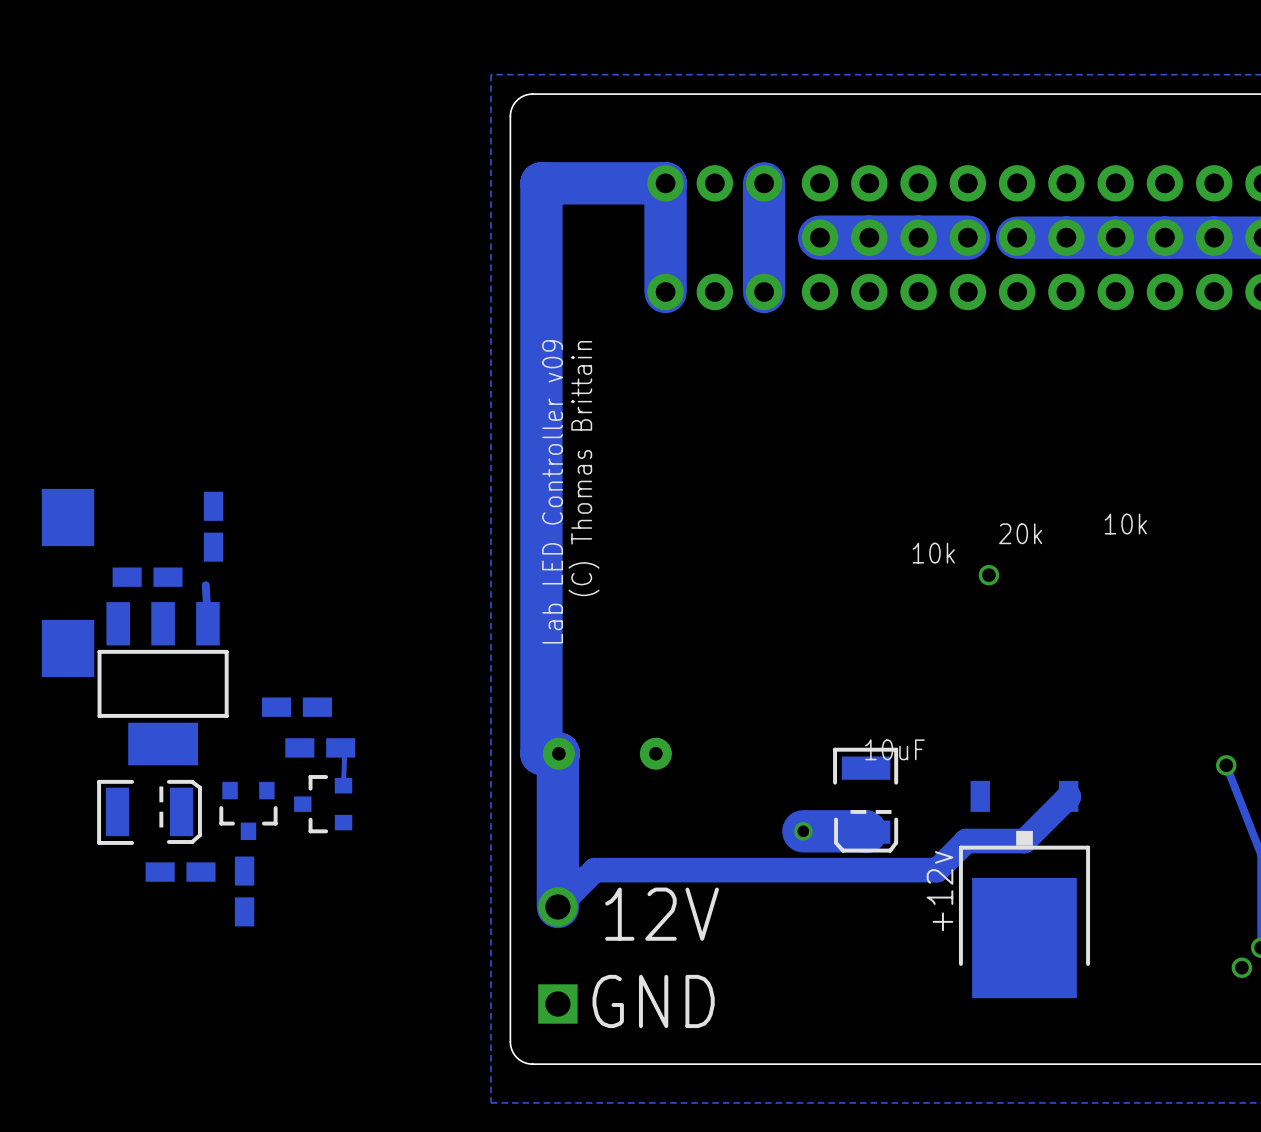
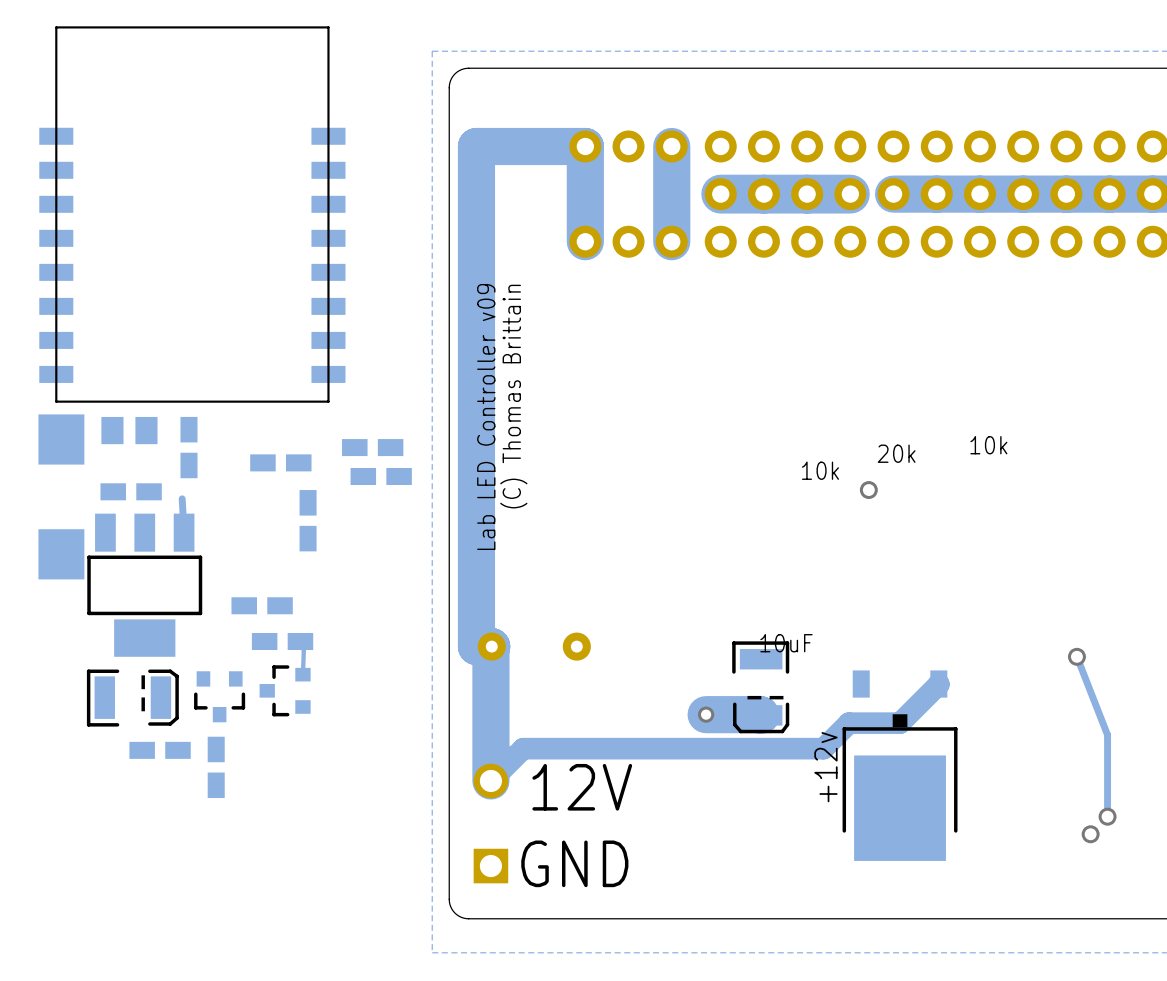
part: none -> (192, 214)
part: none -> (129, 430)
part: none -> (372, 447)
part: none -> (280, 462)
part: none -> (381, 476)
part: none -> (308, 520)

